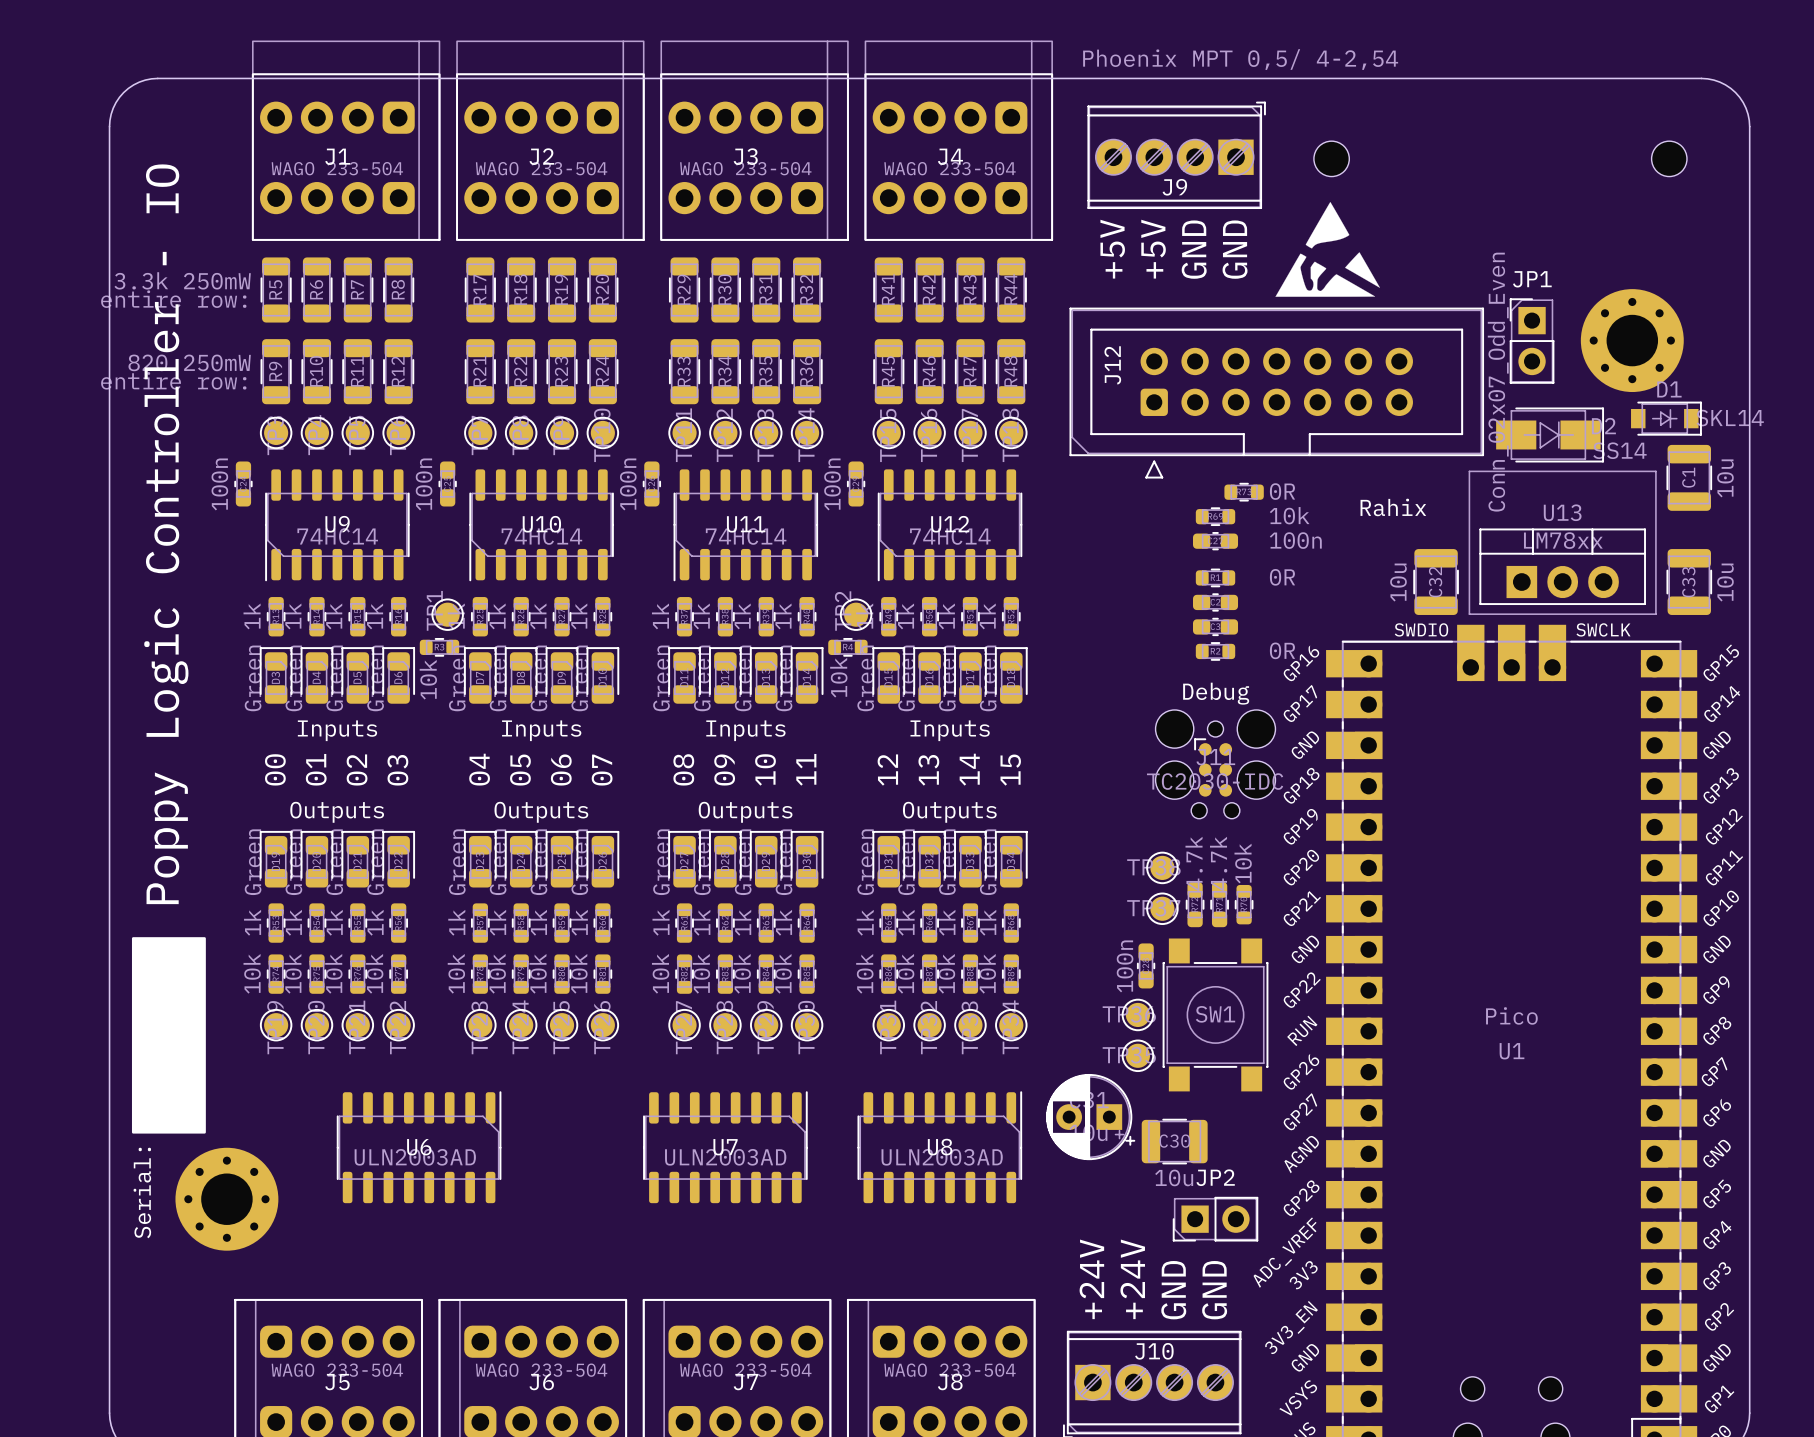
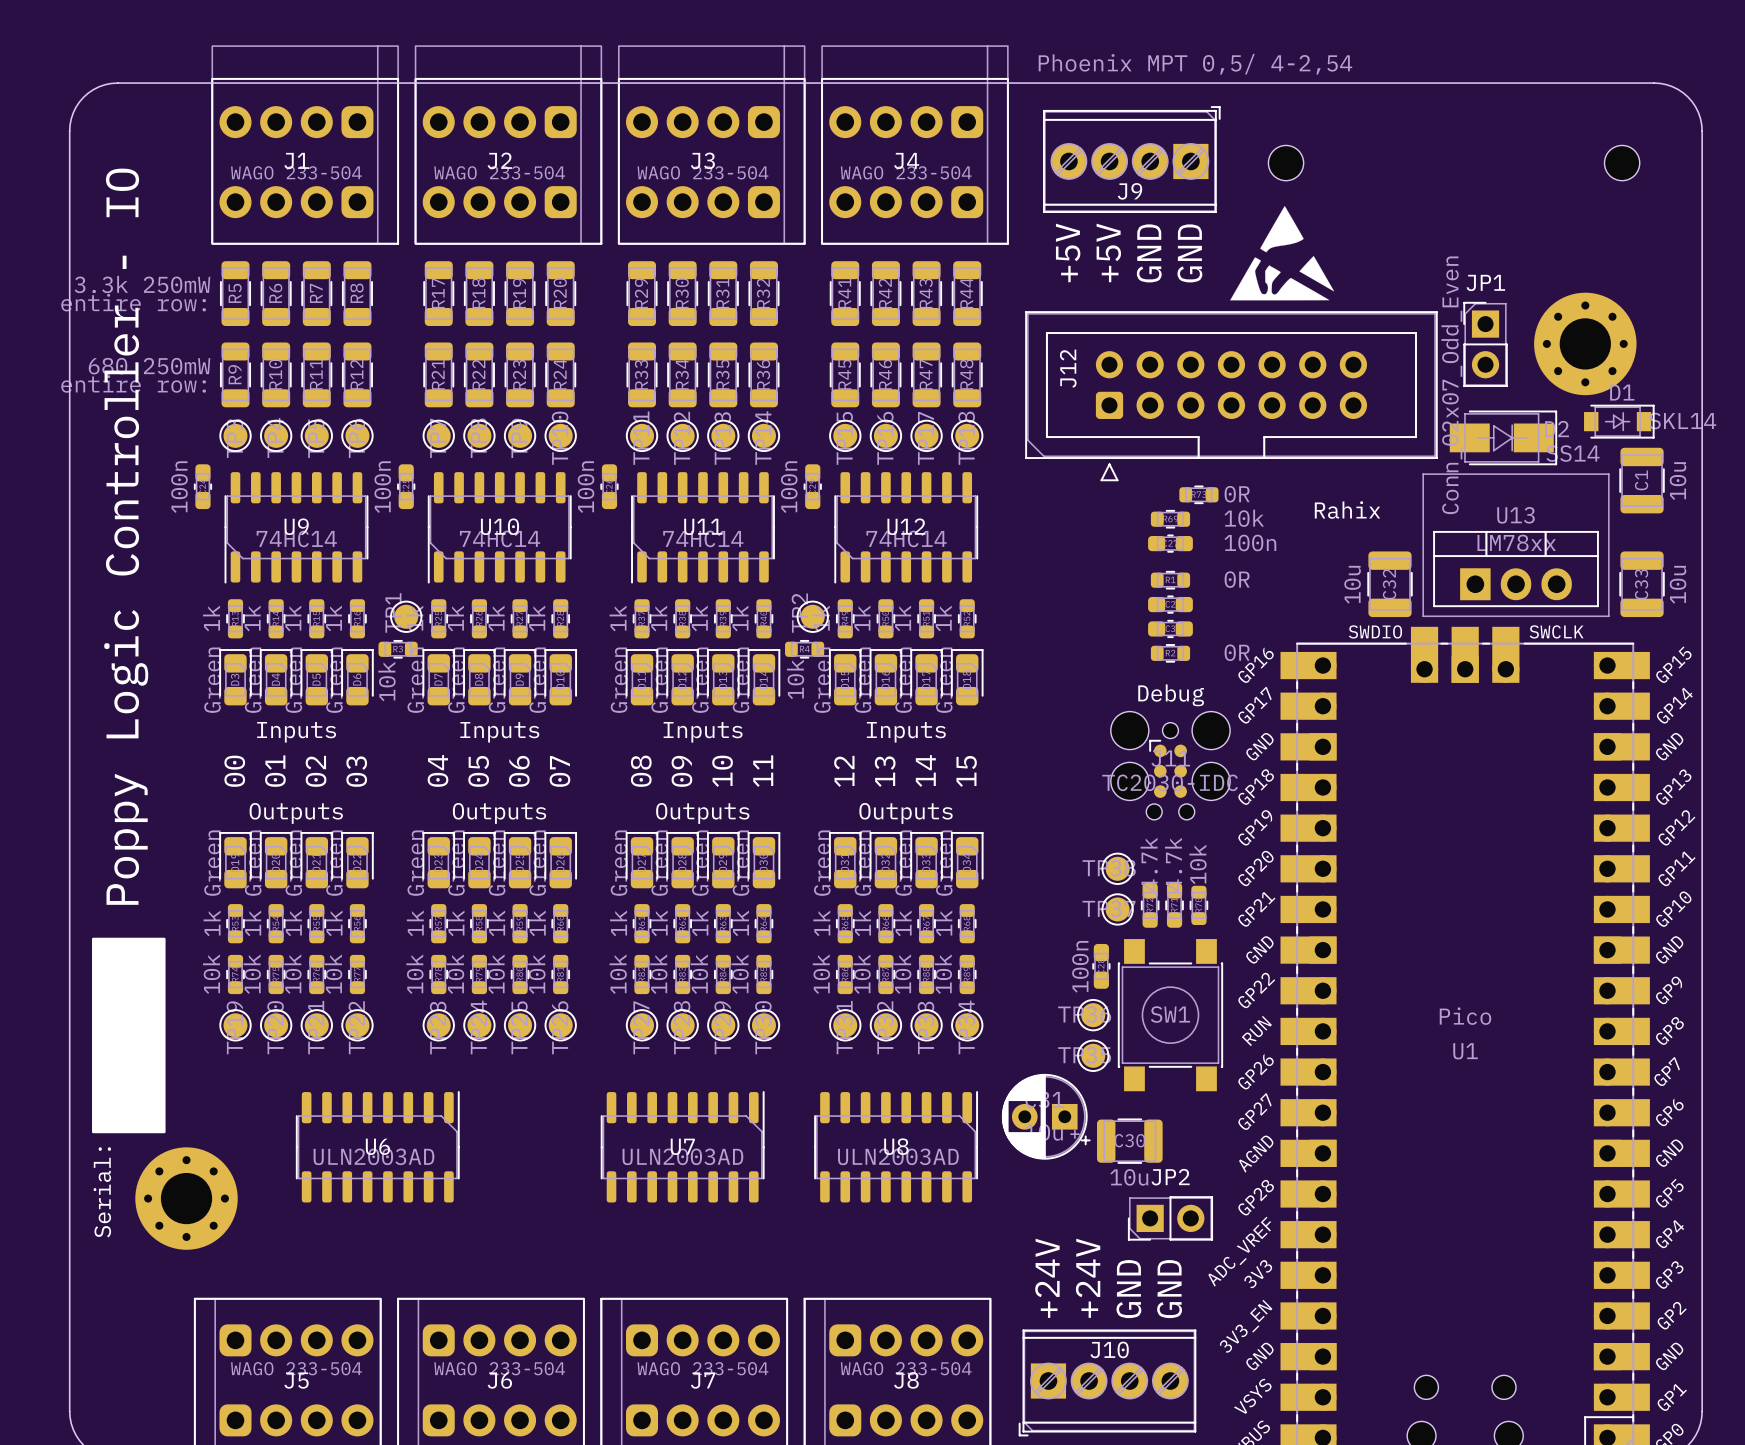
R9 value: 820 250mW (189, 362) -> 680 250mW (149, 366)

